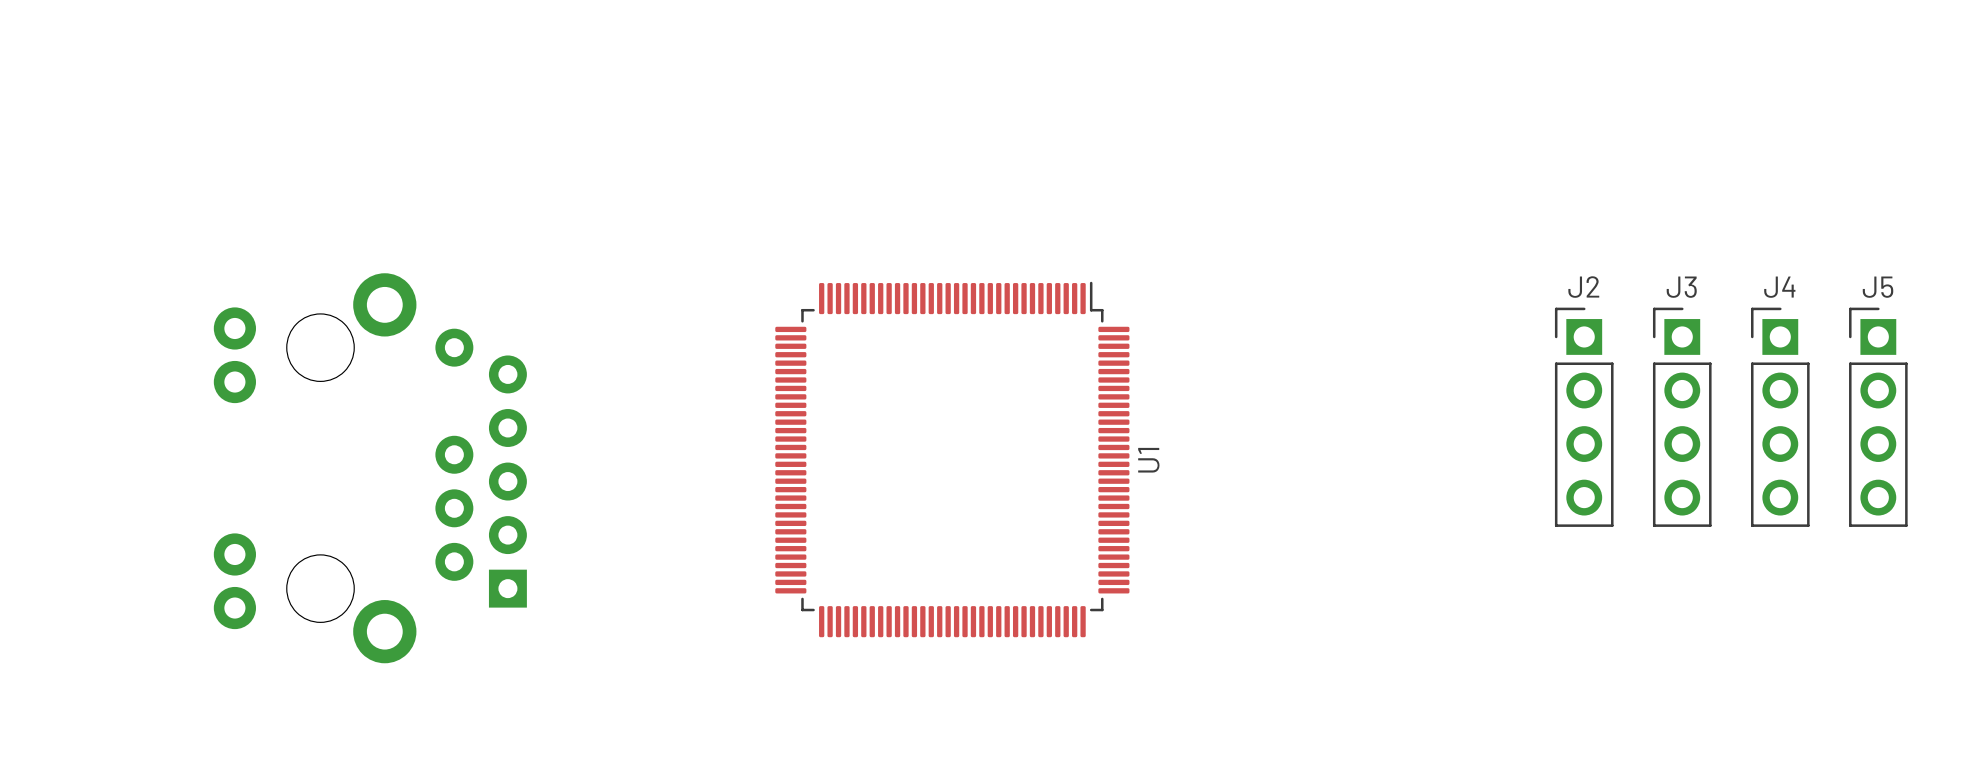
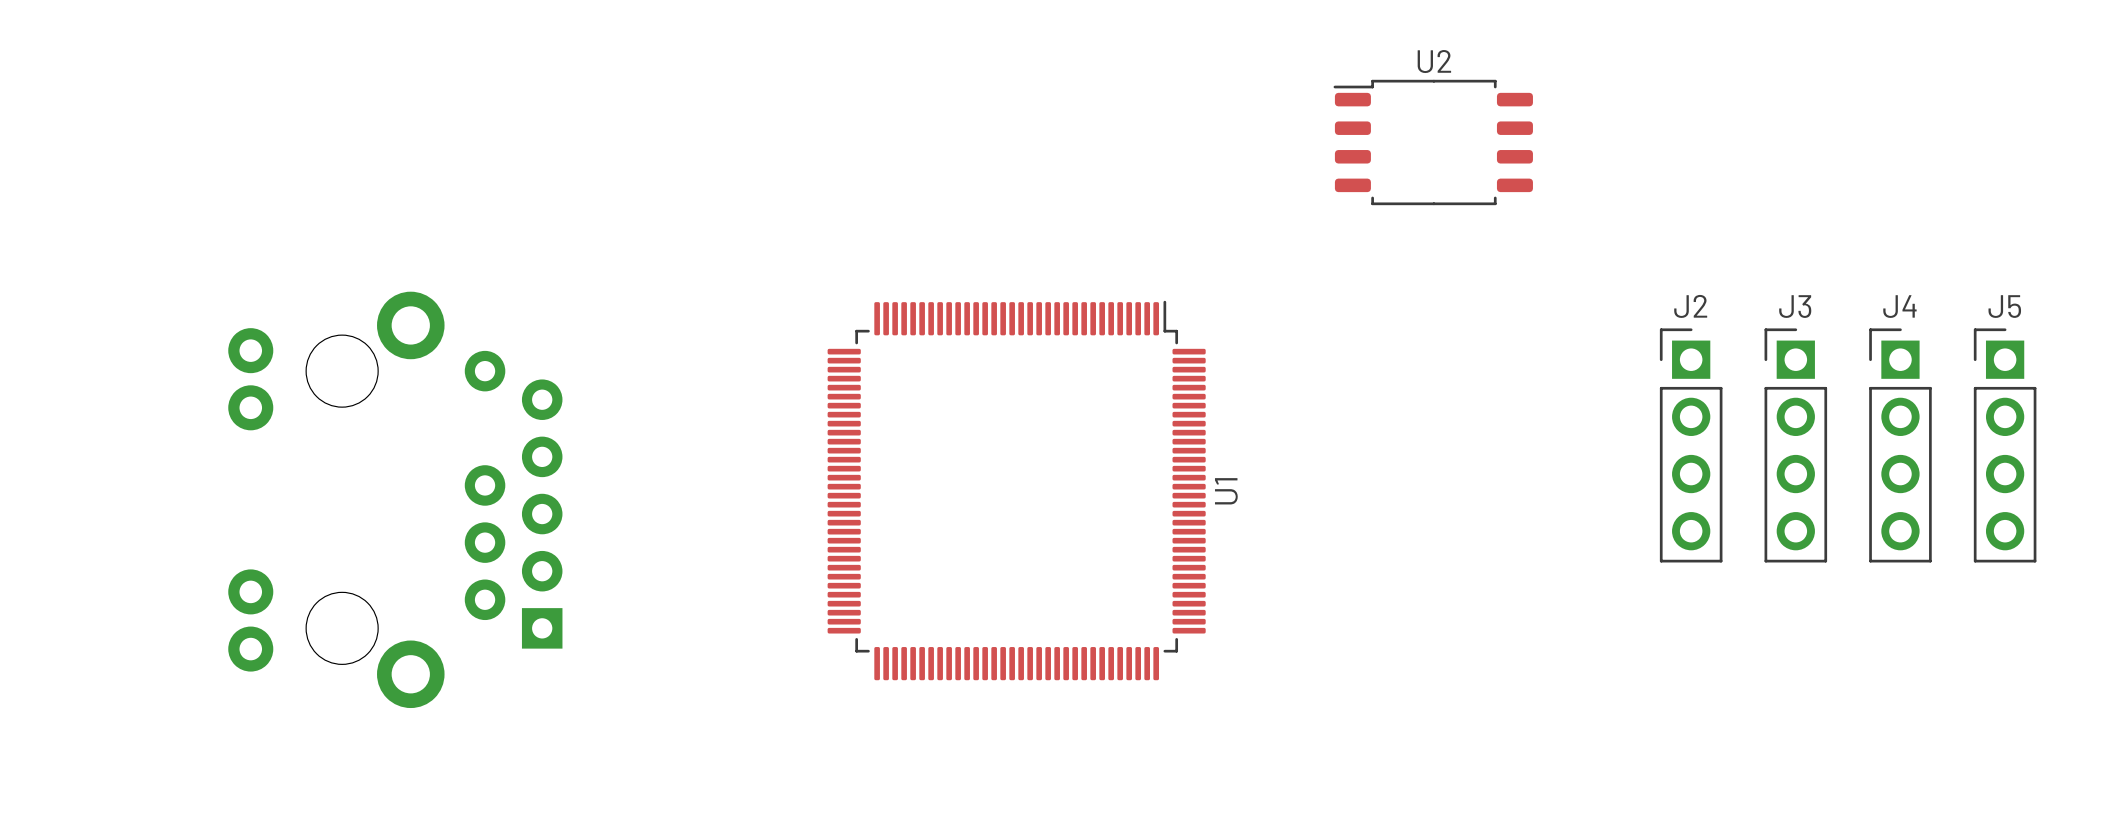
U2: none -> (1433, 142)

